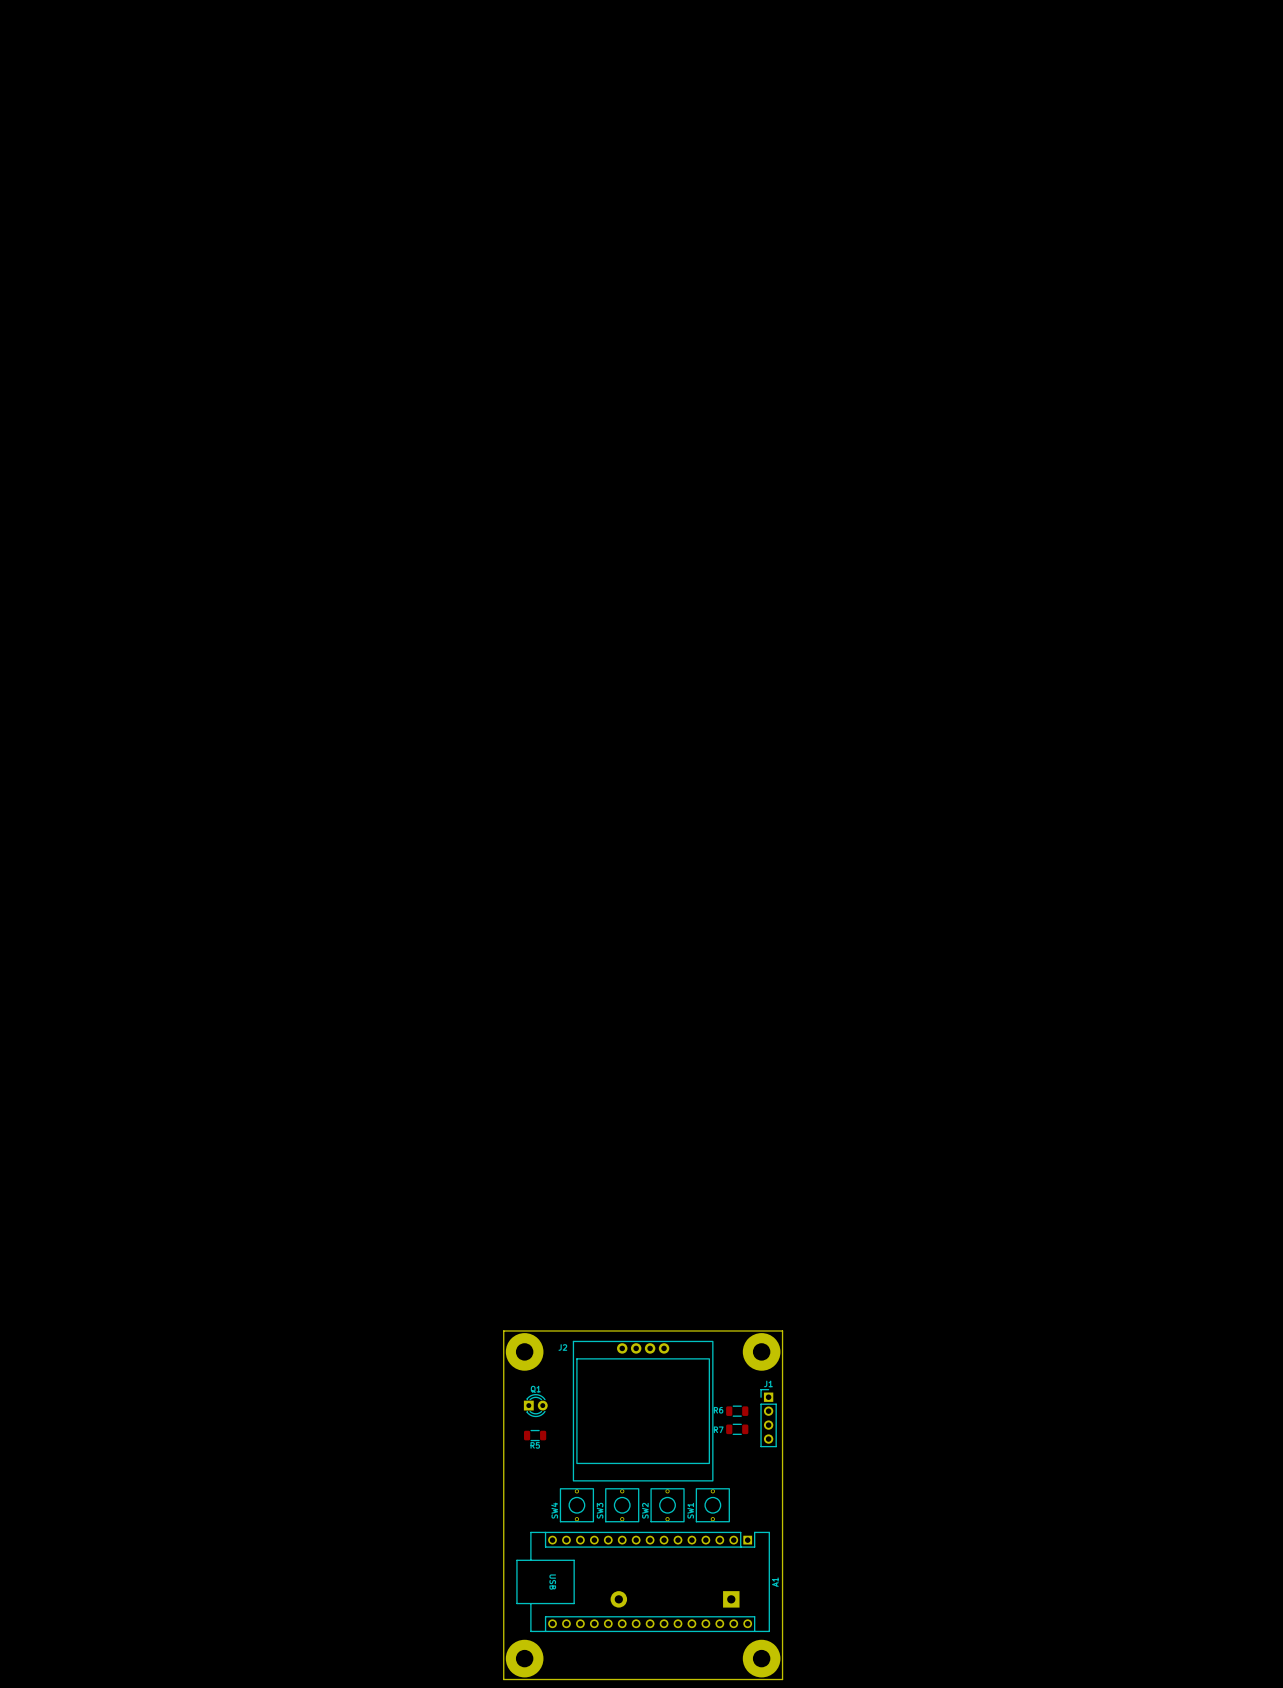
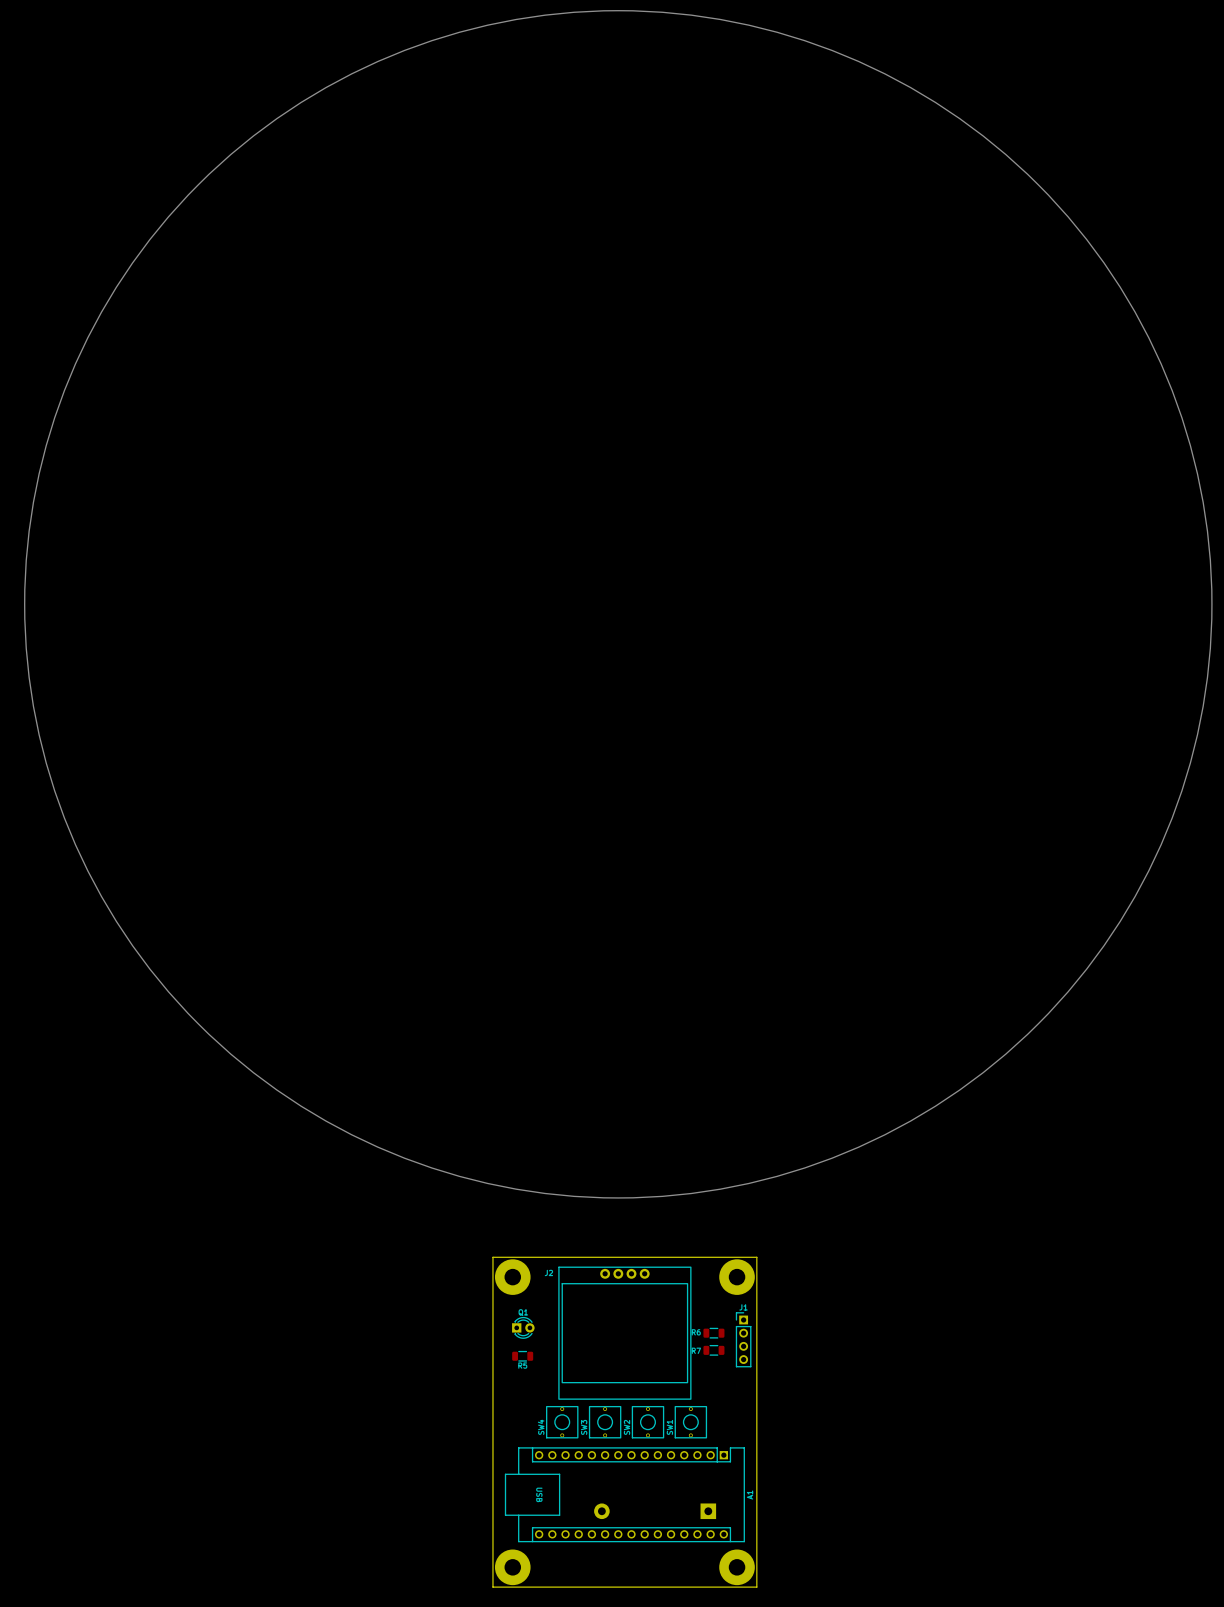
drawing: none -> [24, 10, 1213, 1199]

